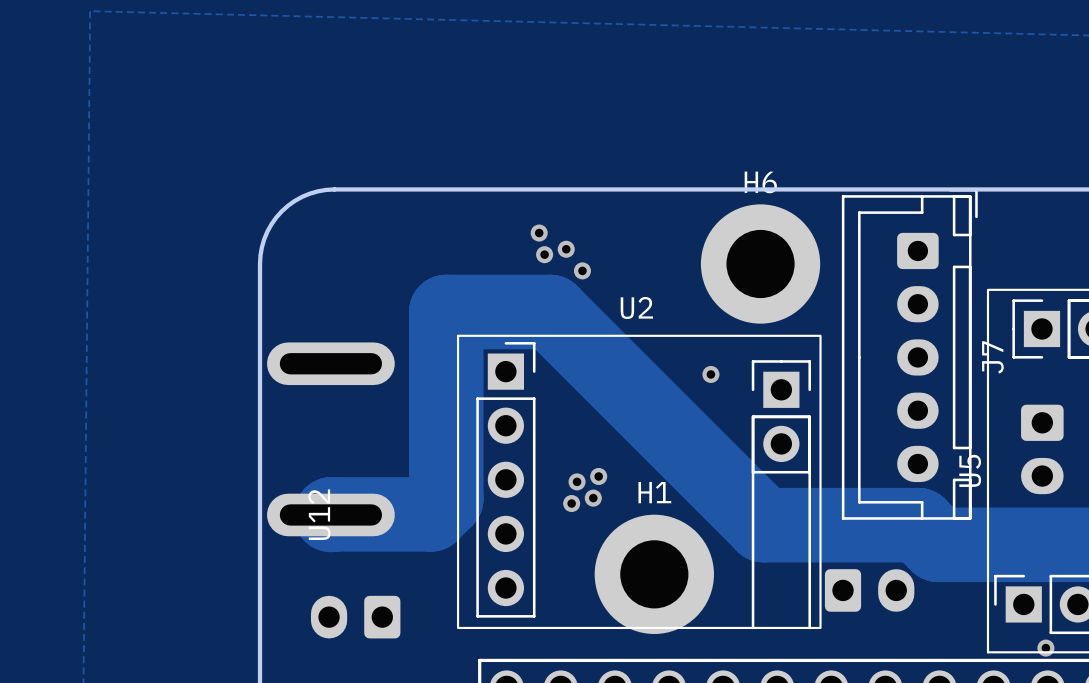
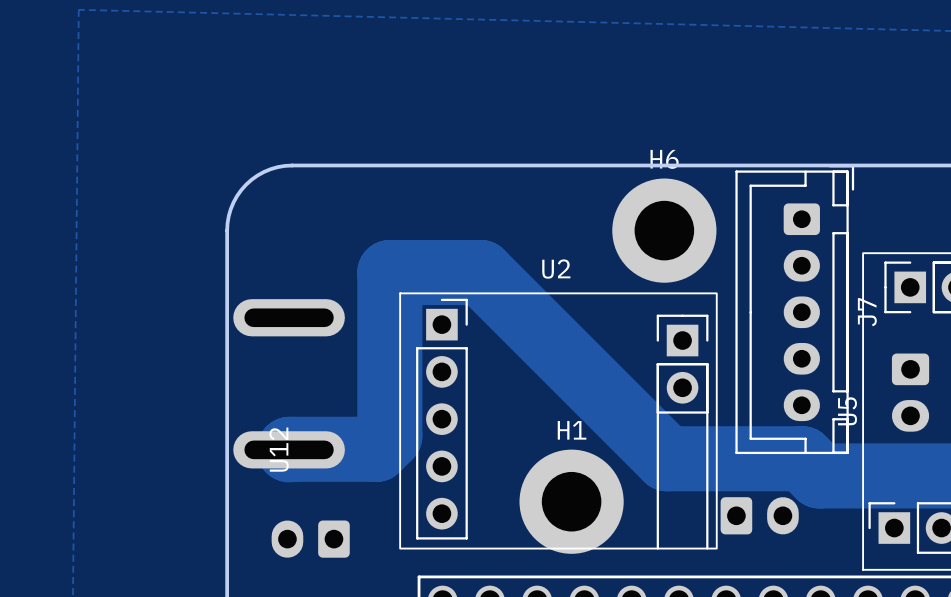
via: (539, 233) -> none
via: (566, 249) -> none
via: (544, 254) -> none
via: (582, 270) -> none
via: (710, 374) -> none
via: (598, 476) -> none
via: (577, 481) -> none
via: (593, 498) -> none
via: (571, 503) -> none
via: (1045, 648) -> none

